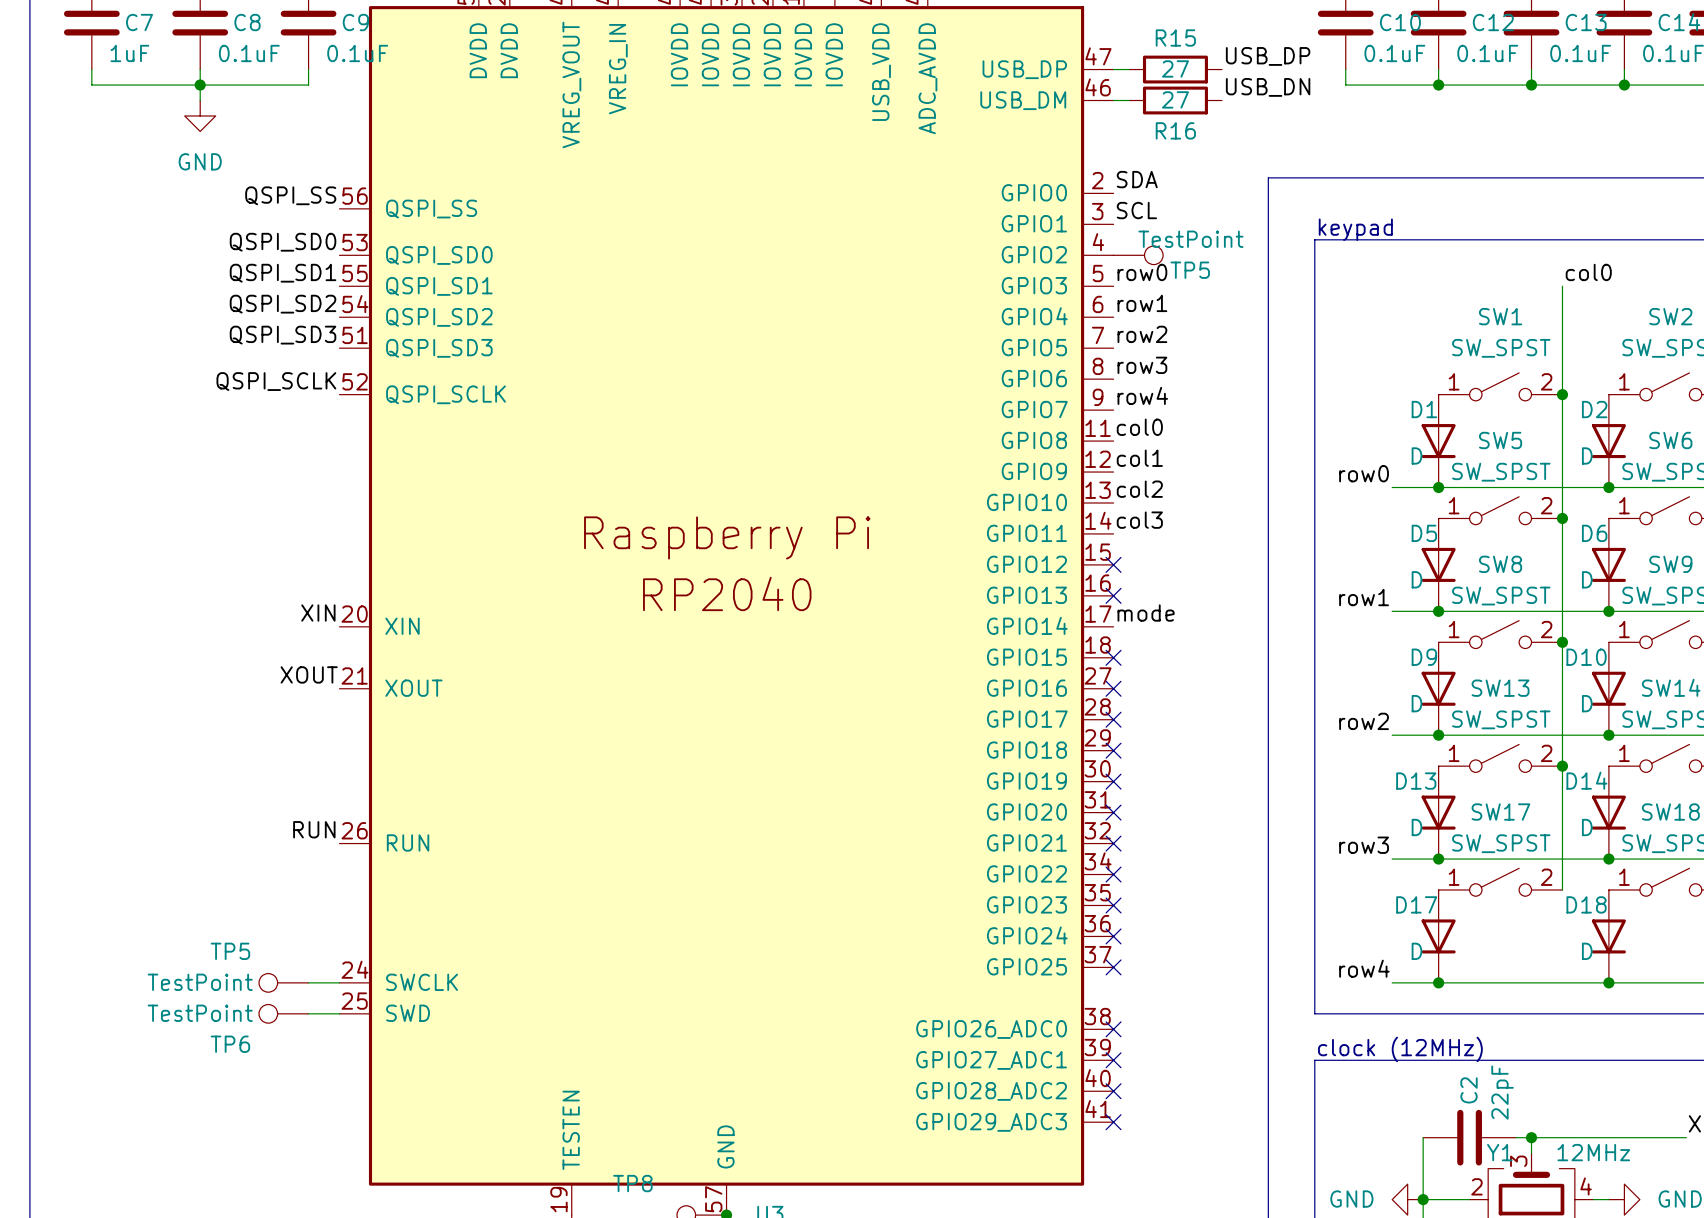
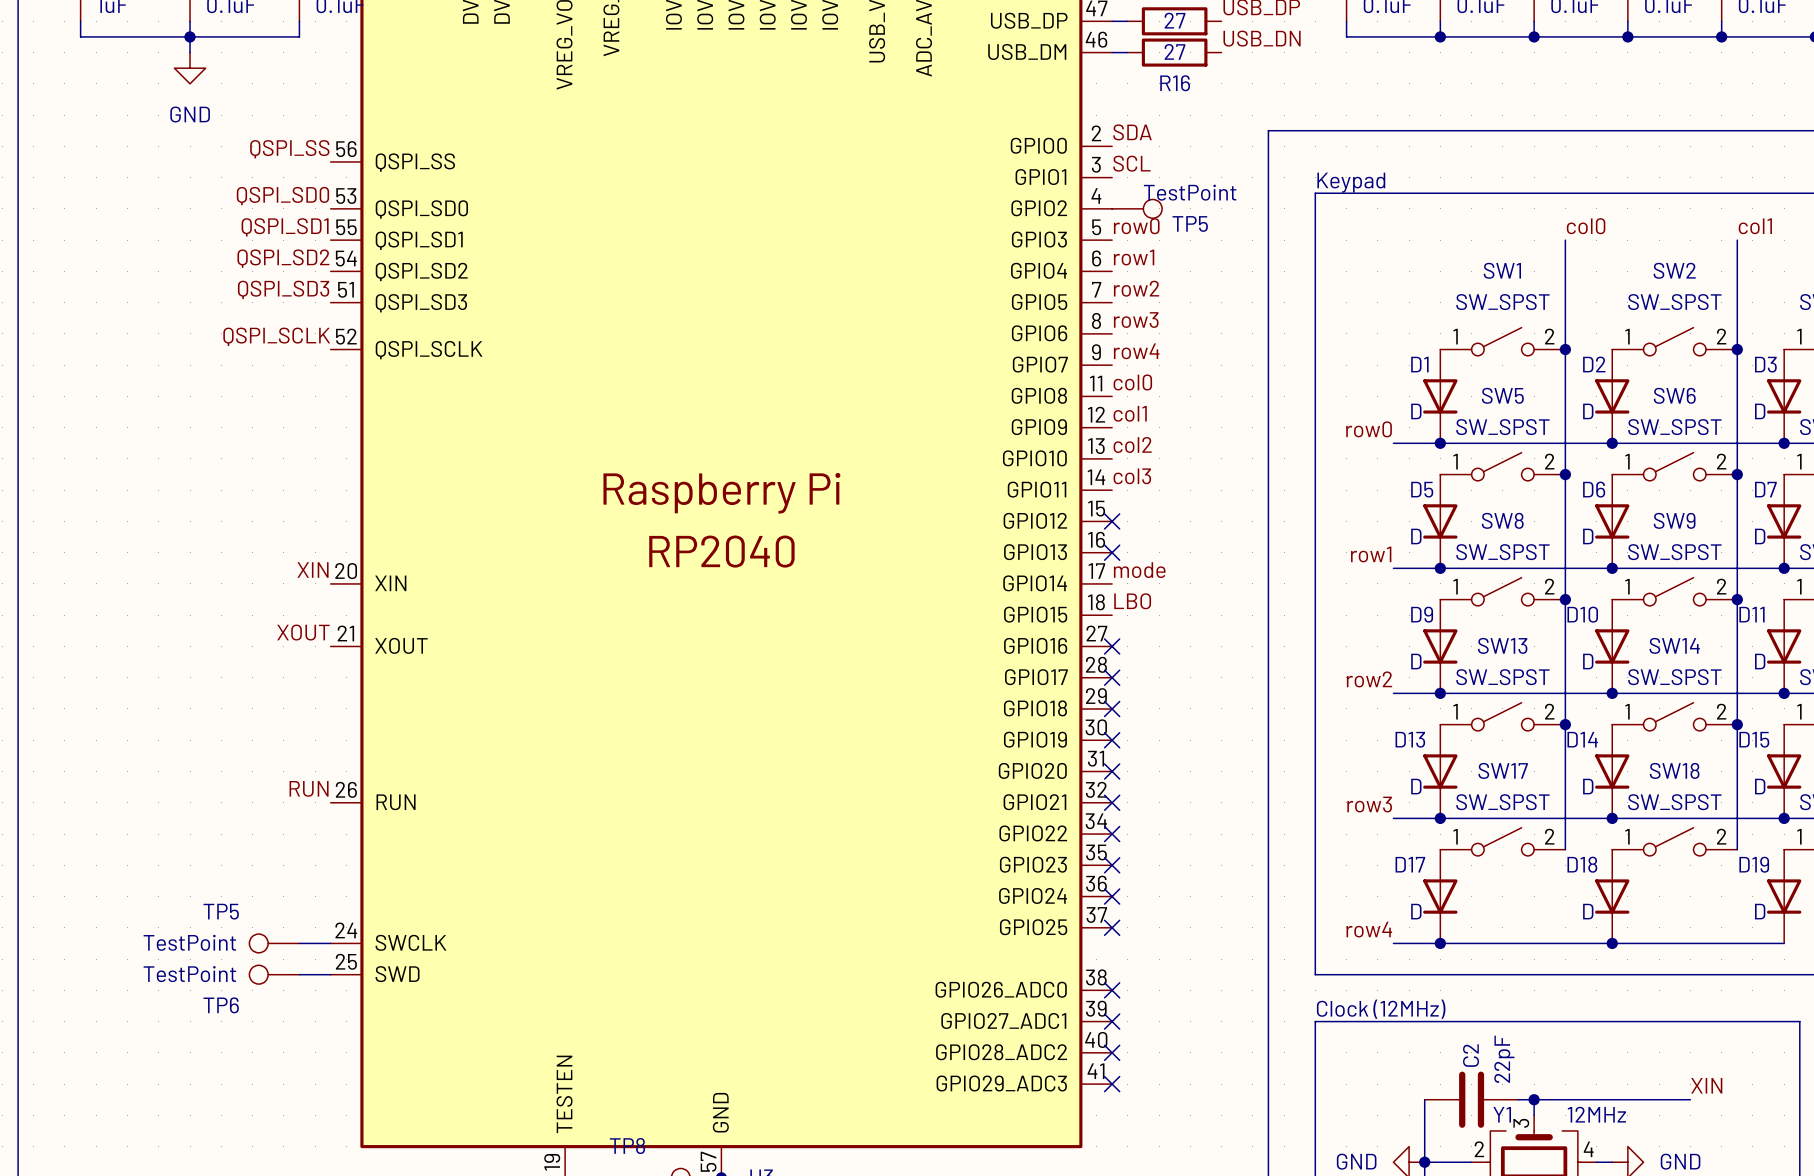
text: keypad (1355, 229) -> Keypad (1351, 182)
label: none -> LBO (1132, 601)
no-connect mark: (1113, 657) -> none
text: clock (12MHz) (1400, 1049) -> Clock (12MHz) (1381, 1009)

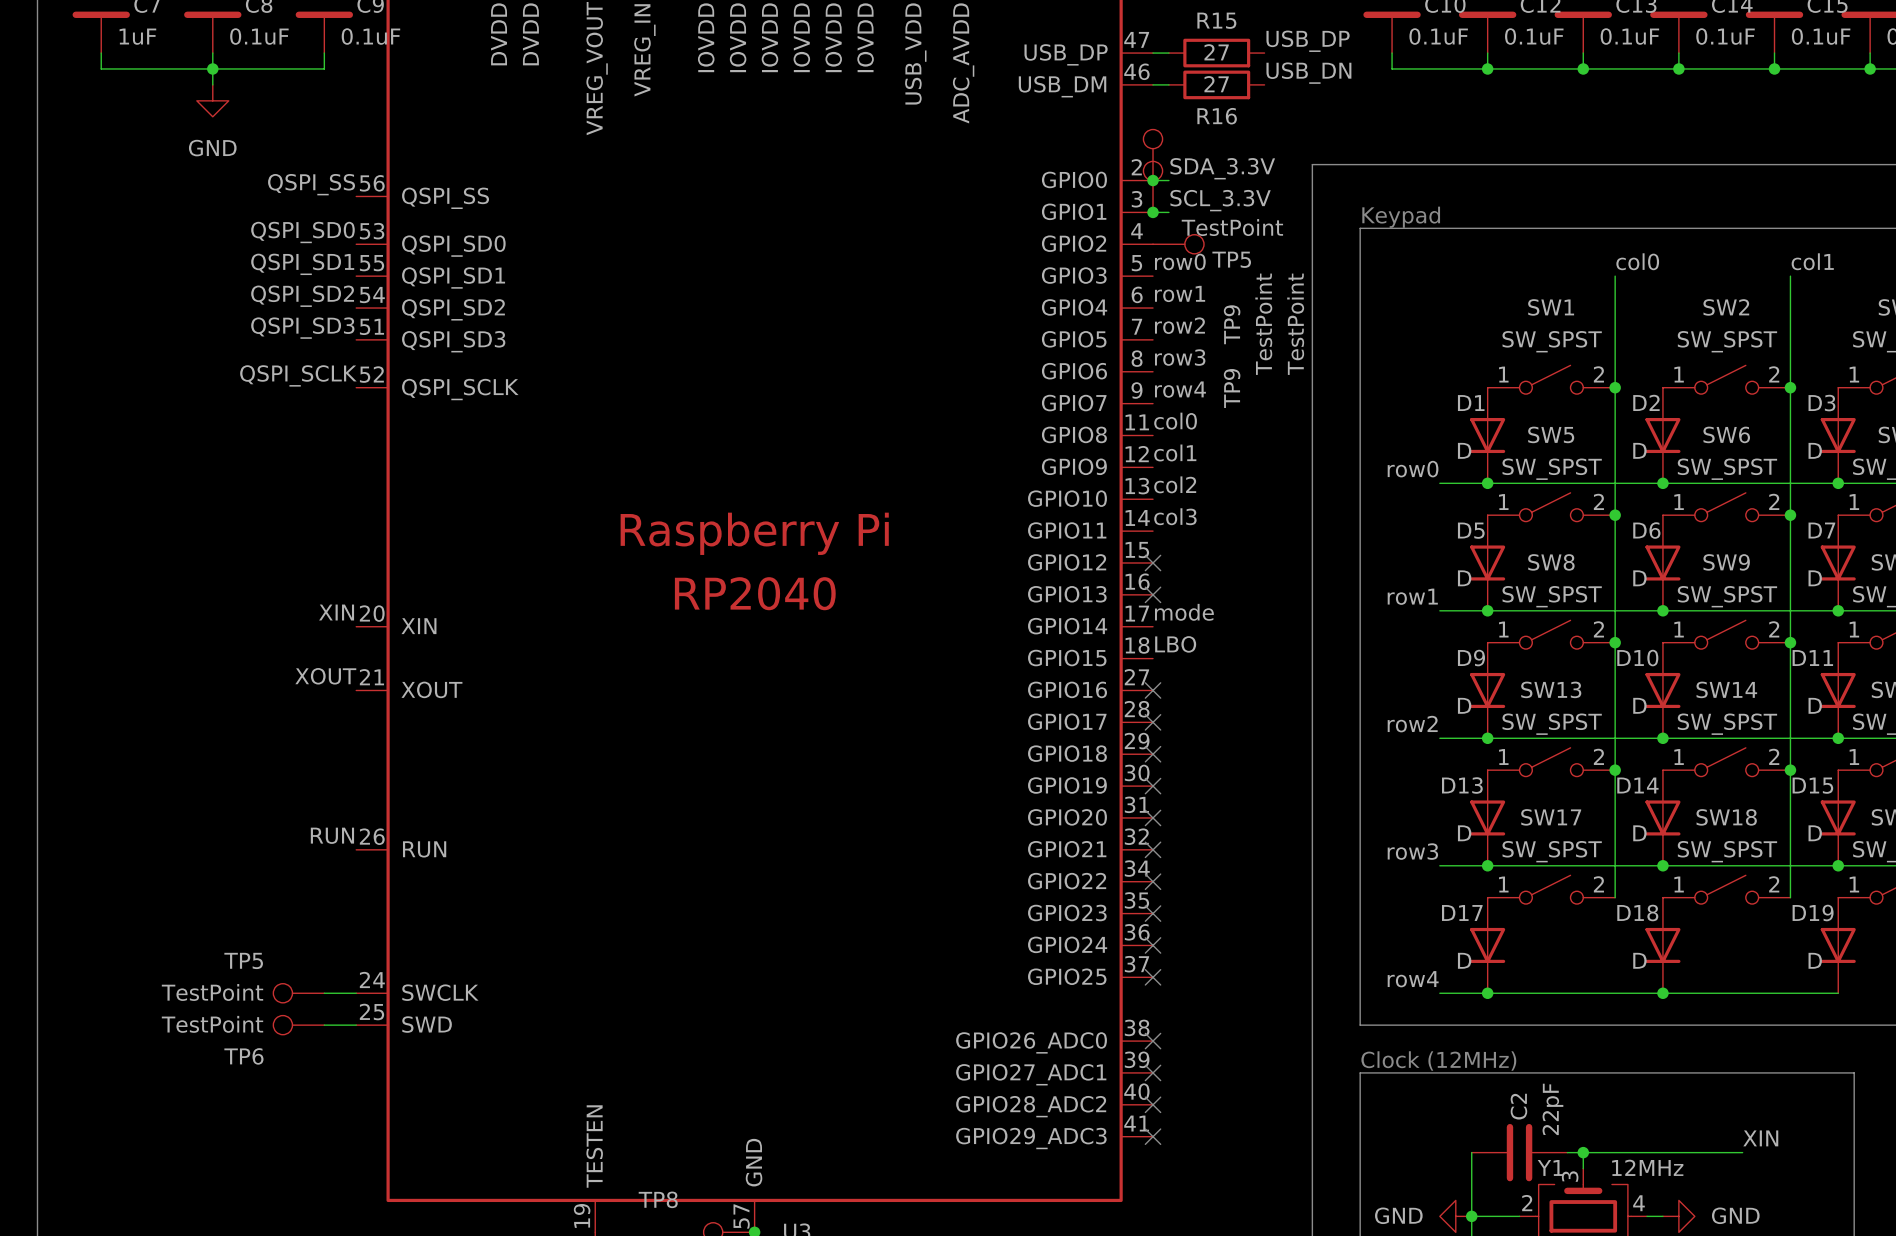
TP9: none -> TestPoint (1153, 155)
label: SDA (1132, 132) -> none
label: none -> SDA_3.3V (1222, 168)
wire: none -> (1153, 180) (1168, 180)
junction: none -> (1153, 180)
TP9: none -> TestPoint (1153, 186)
label: SCL (1131, 163) -> none
label: none -> SCL_3.3V (1220, 200)
wire: none -> (1153, 212) (1168, 212)
junction: none -> (1153, 212)

